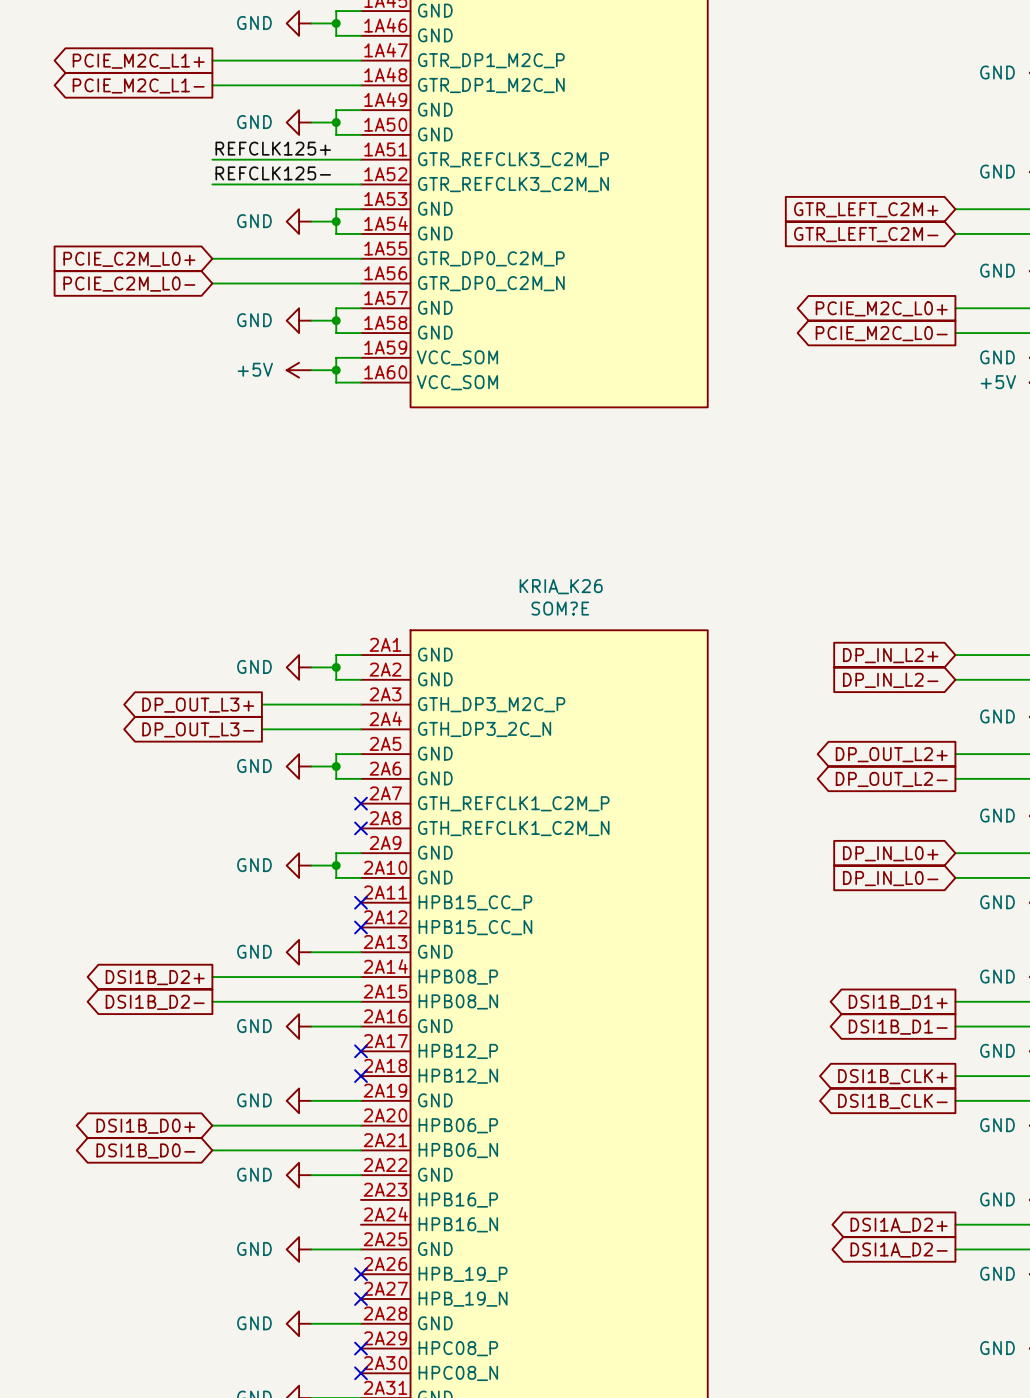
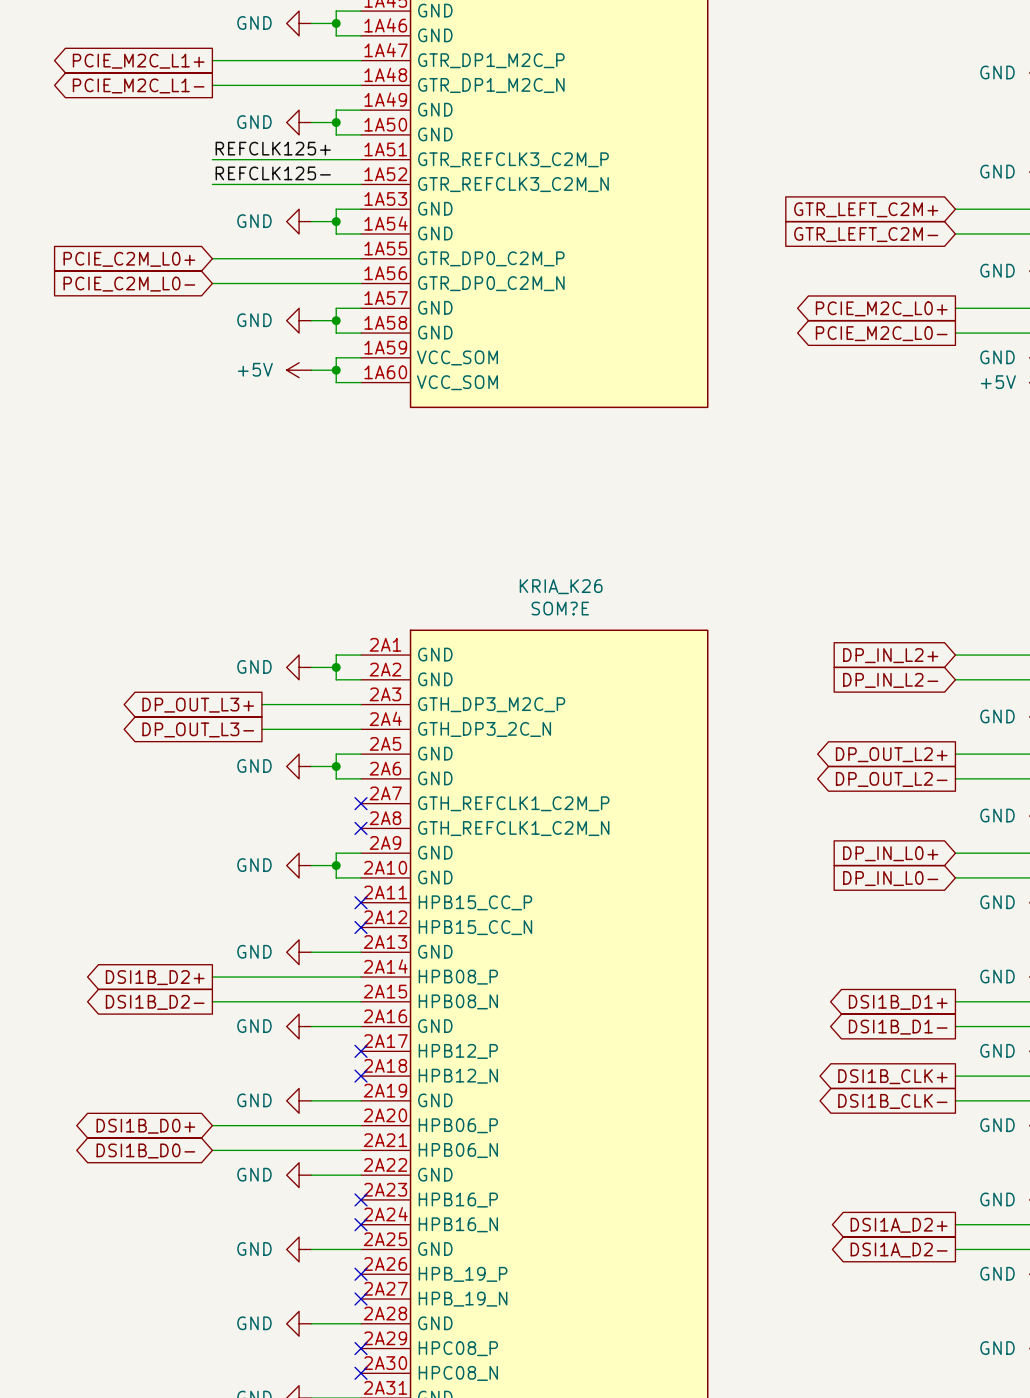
no-connect mark: none -> (361, 1199)
no-connect mark: none -> (361, 1224)

